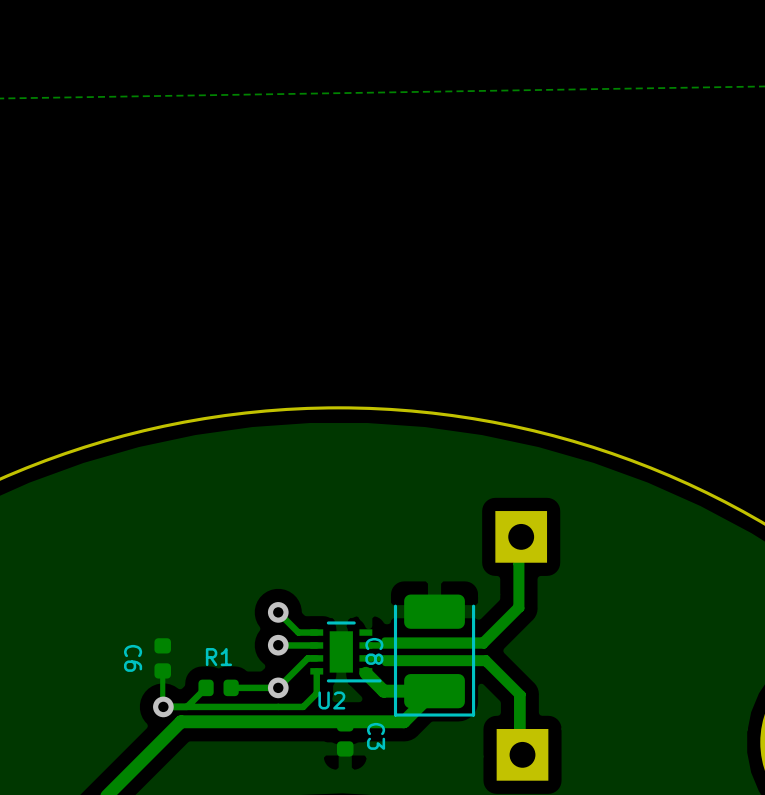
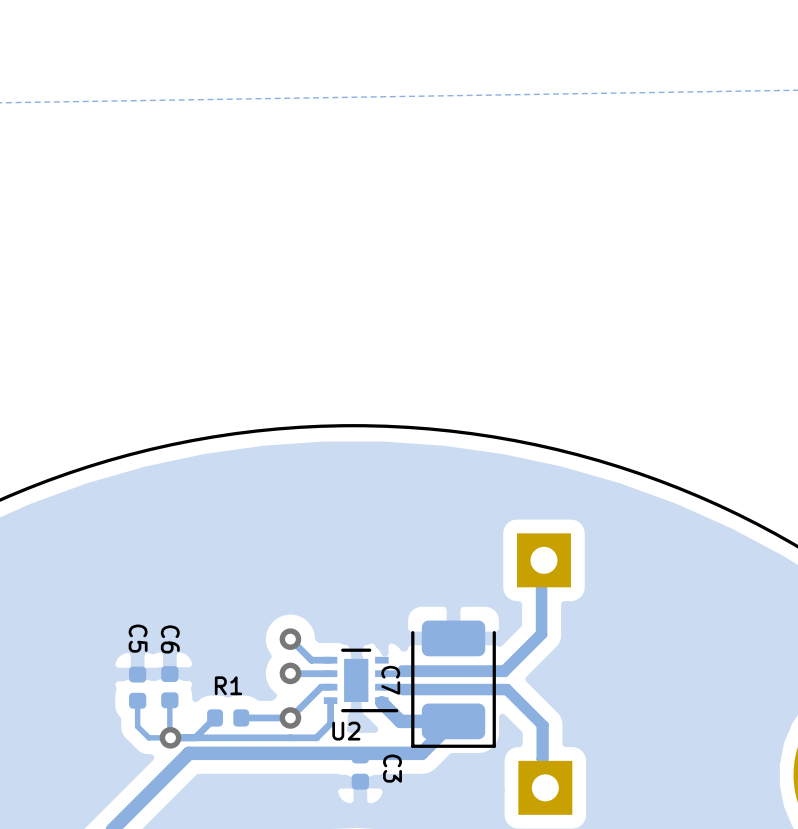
C8 name: C8 (374, 651) -> C7 (390, 680)
C5: none -> (137, 687)
C6 name position: C6 (133, 658) -> C6 (170, 639)
track: none -> (137, 700) (137, 726) (148, 737) (170, 737)

